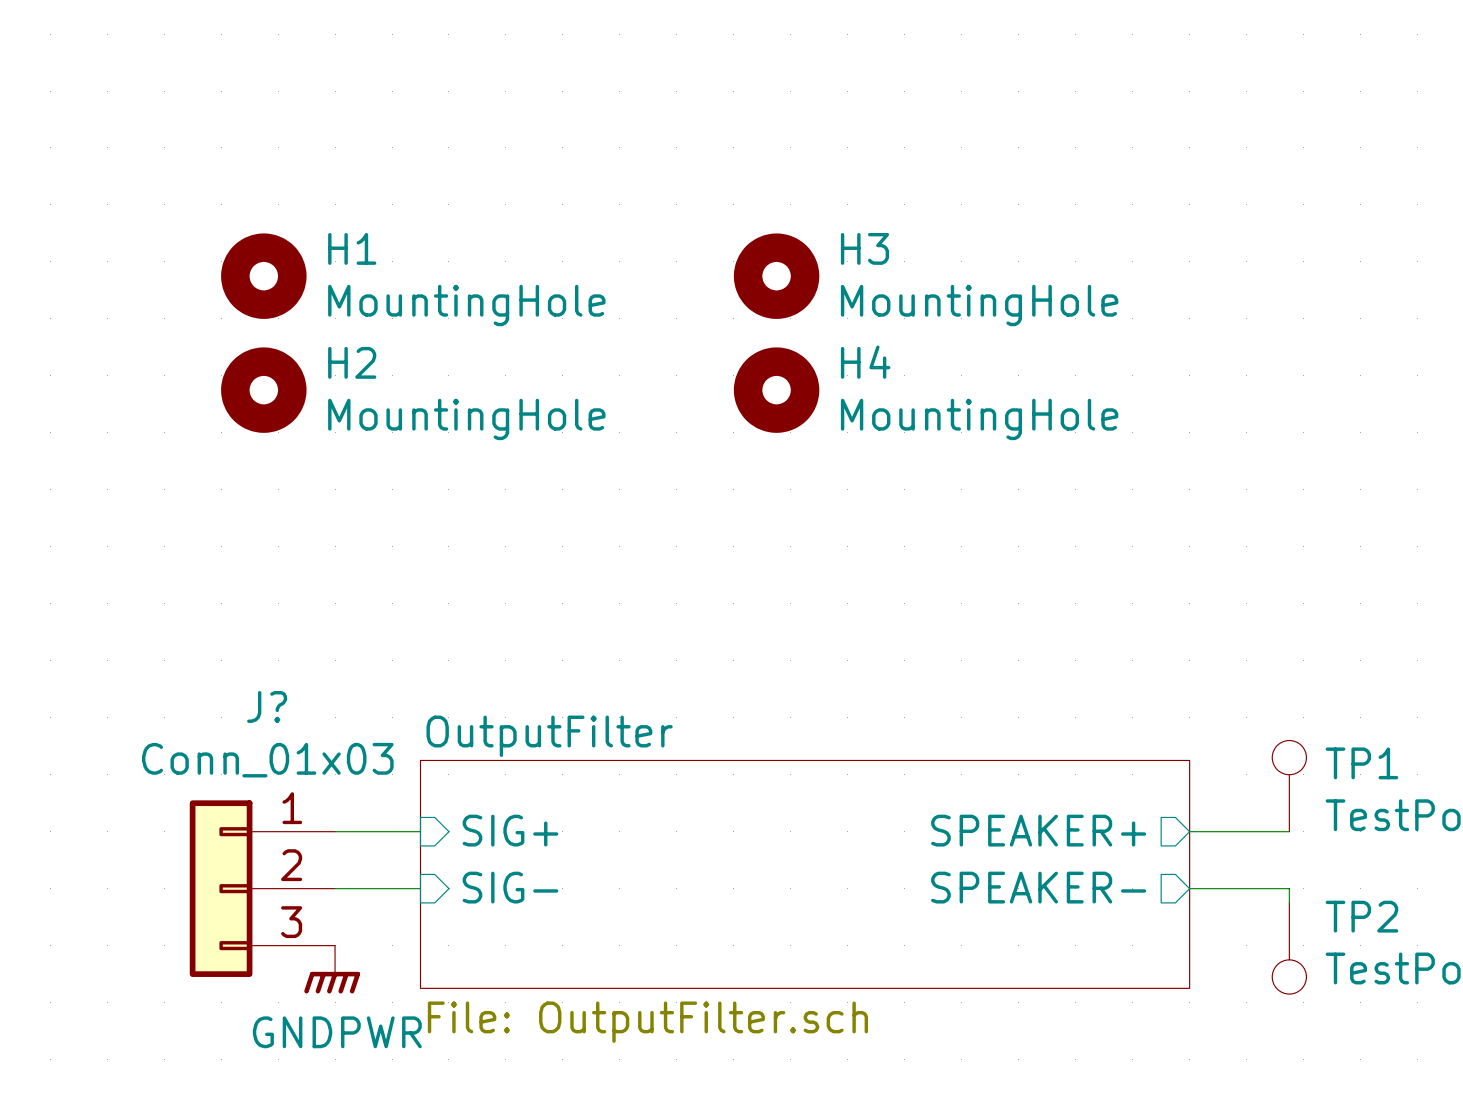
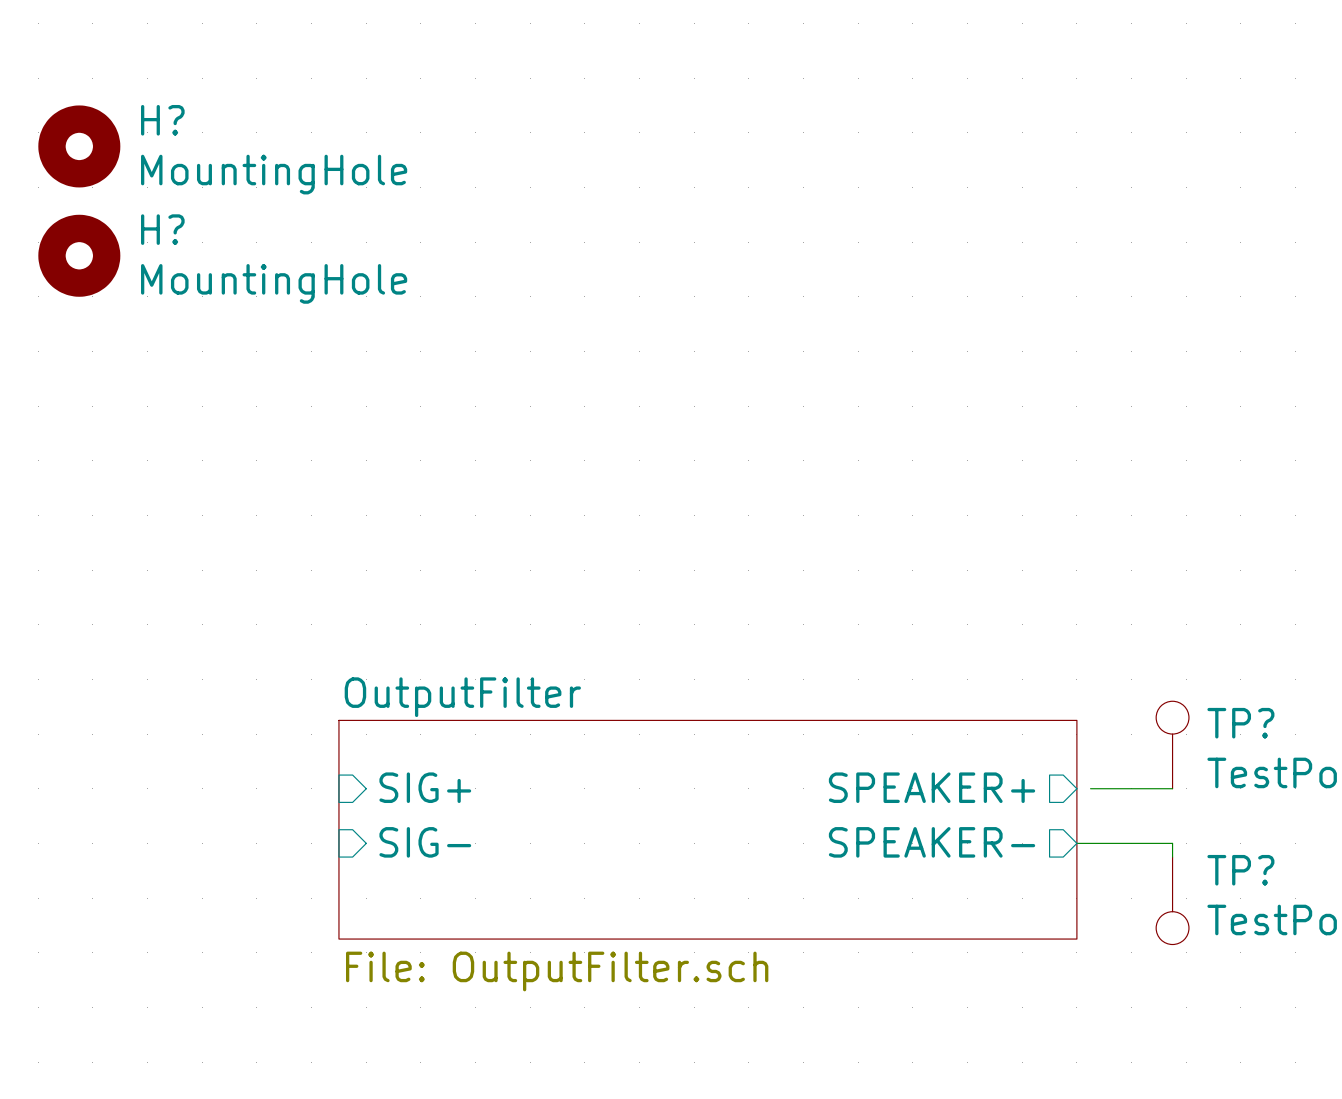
H?: none -> MountingHole (79, 146)
H?: none -> MountingHole (79, 255)
H1: MountingHole (263, 276) -> none
H3: MountingHole (776, 276) -> none
H2: MountingHole (263, 390) -> none
H4: MountingHole (776, 390) -> none
TP1 name: TP1 (1361, 763) -> TP? (1240, 723)
wire: (335, 831) (420, 831) -> none
wire: (1189, 831) (1203, 831) -> none
J?: Conn_01x03 (262, 888) -> none
wire: (335, 888) (420, 888) -> none
TP2 name: TP2 (1361, 916) -> TP? (1240, 870)
power symbol: GNDPWR (332, 969) -> none

